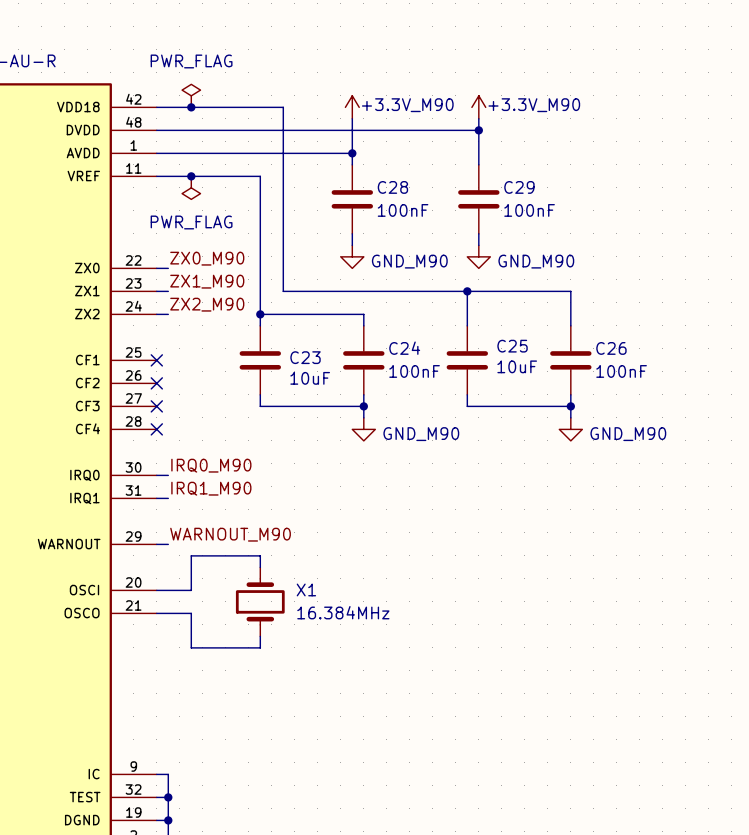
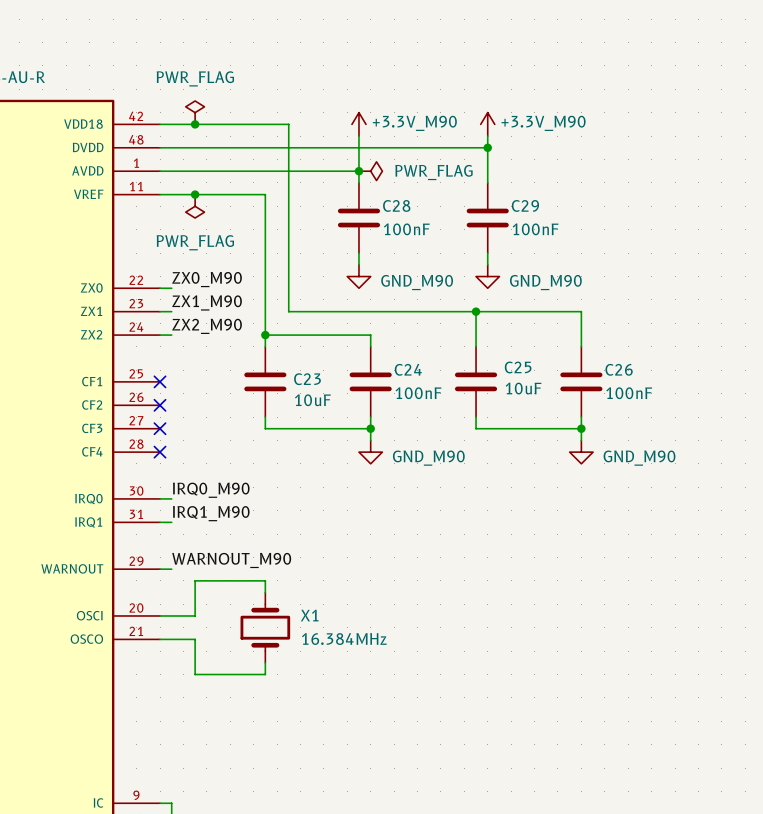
power symbol: none -> PWR_FLAG (370, 171)

